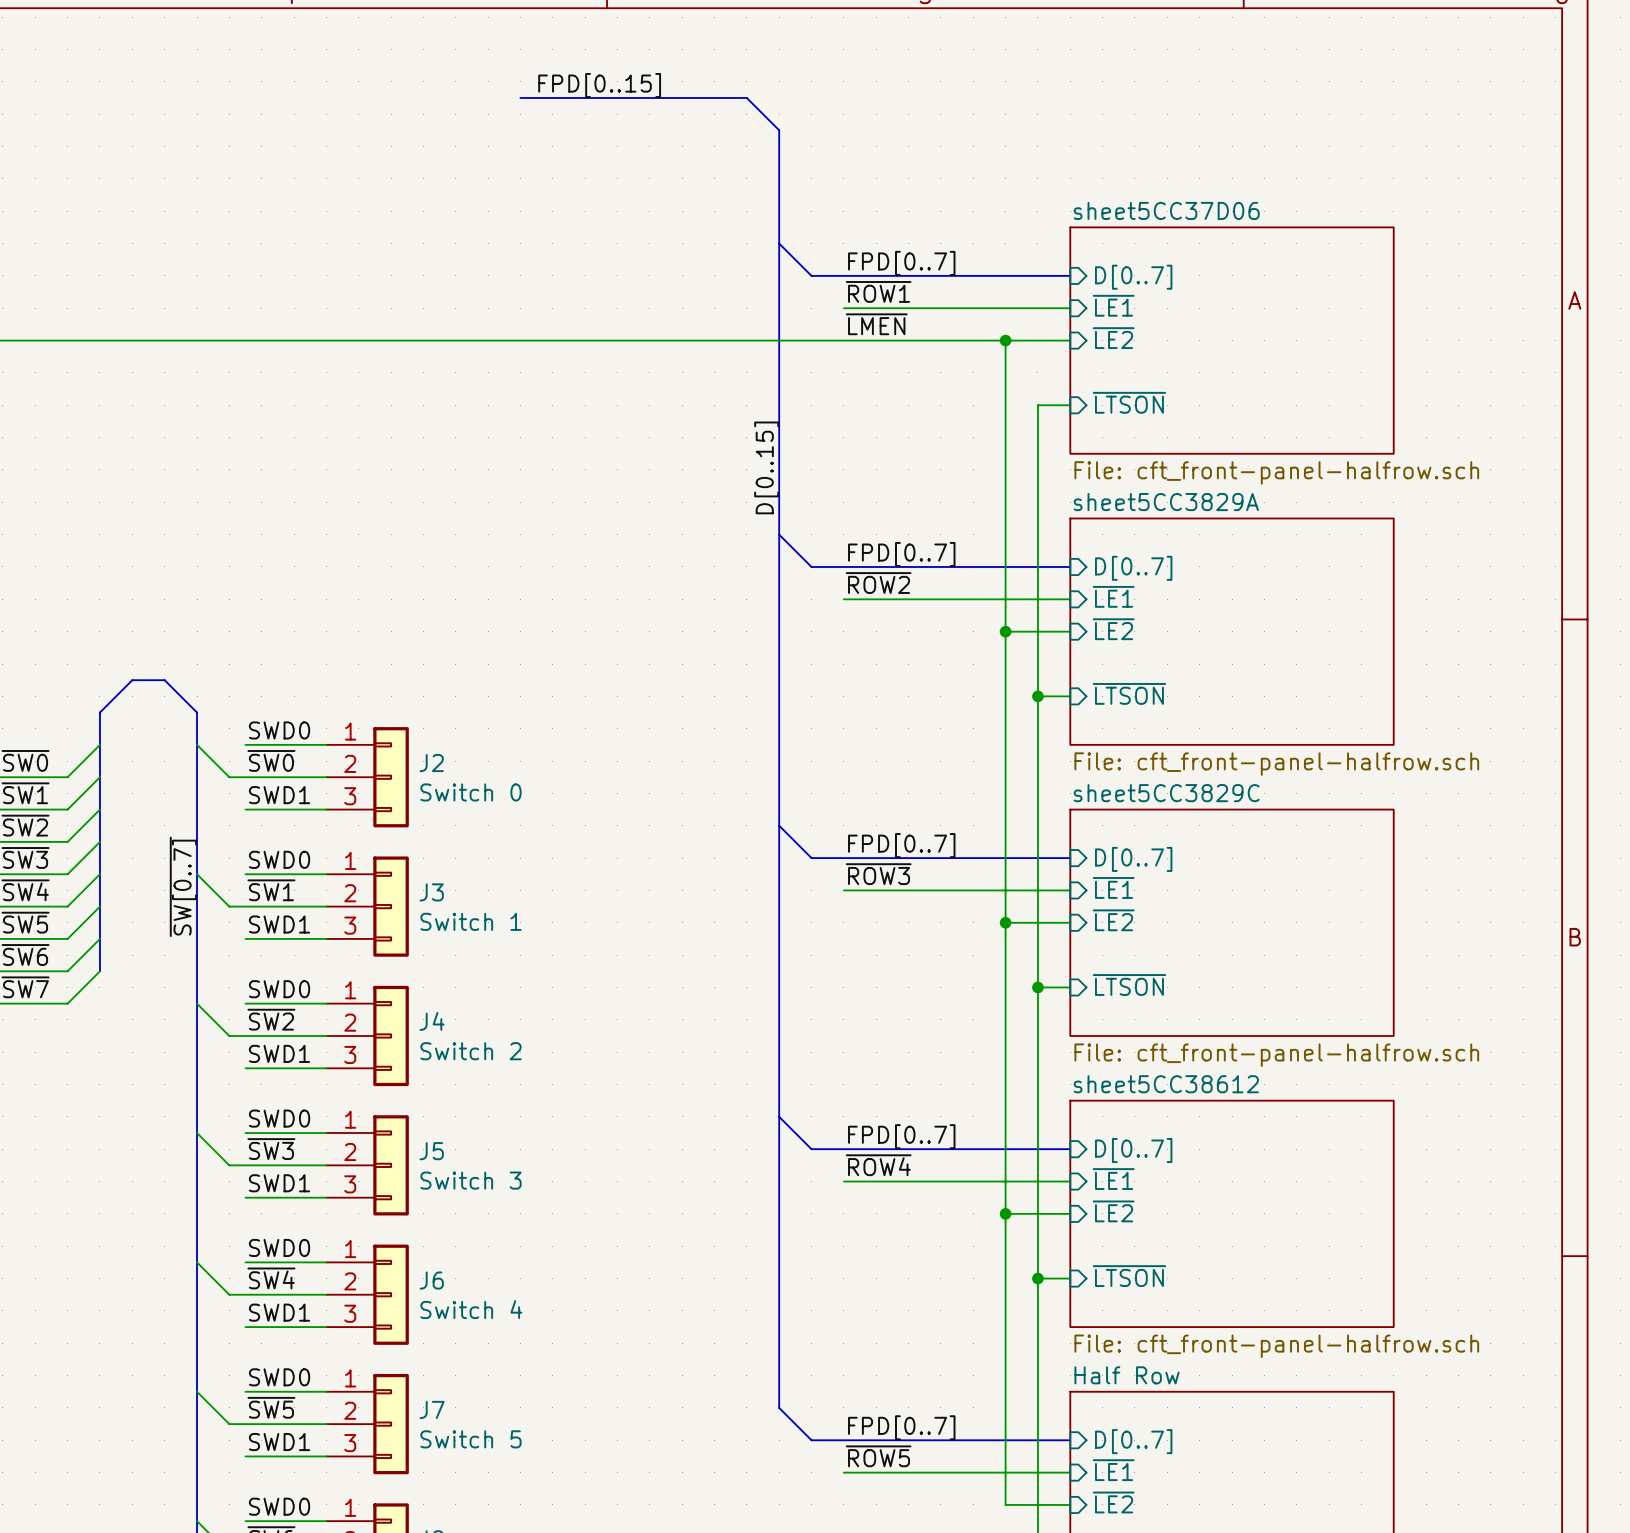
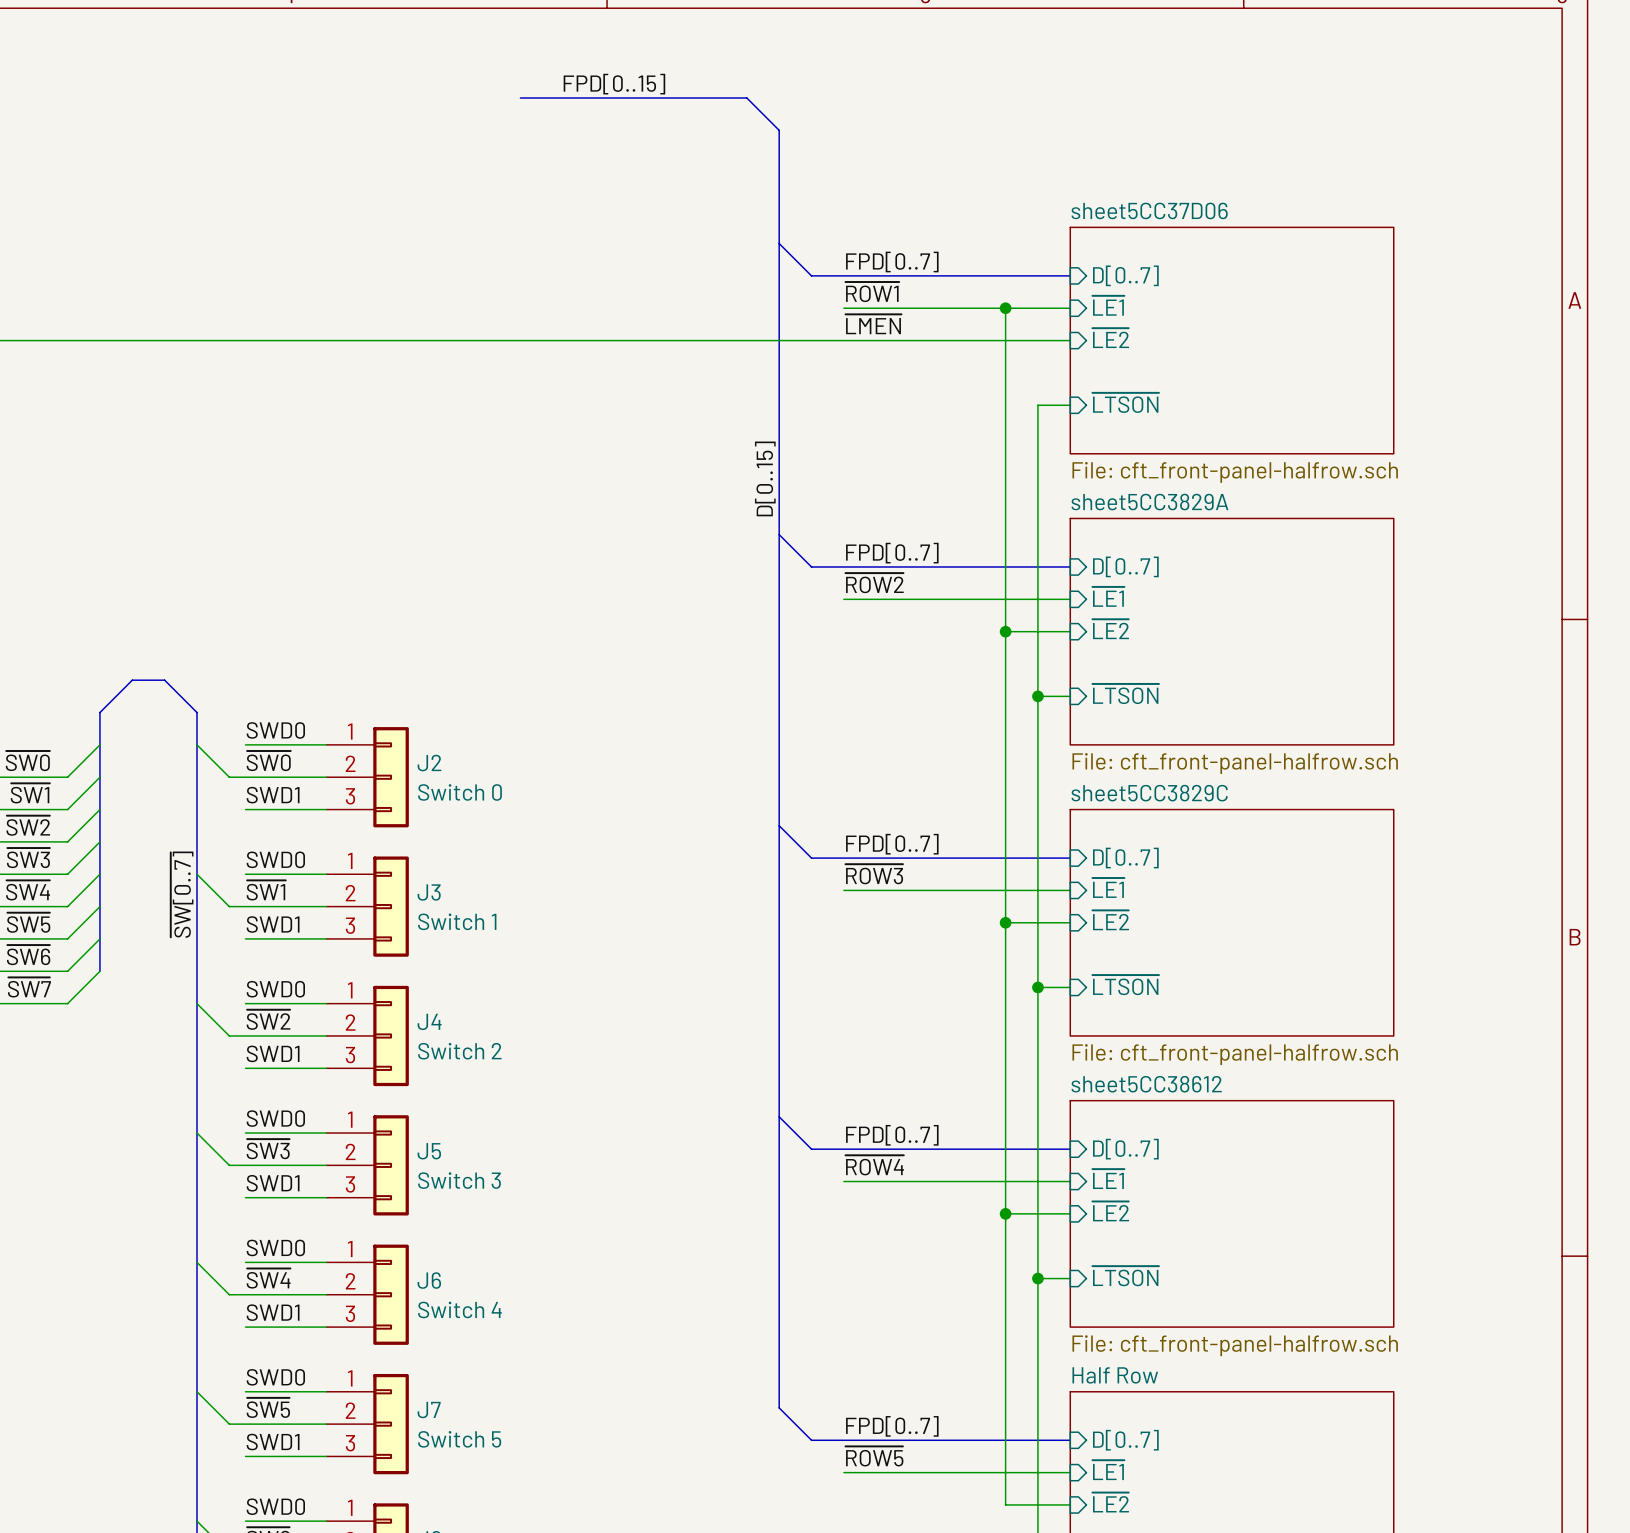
wire: none -> (1005, 308) (1005, 340)
junction position: (1005, 340) -> (1005, 308)

